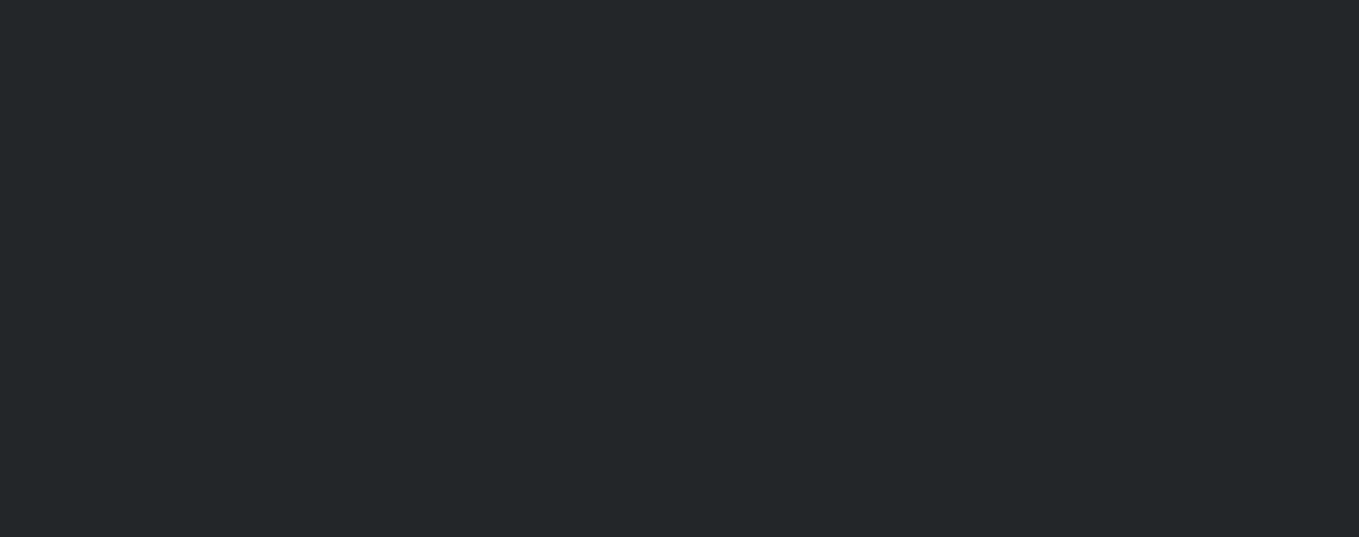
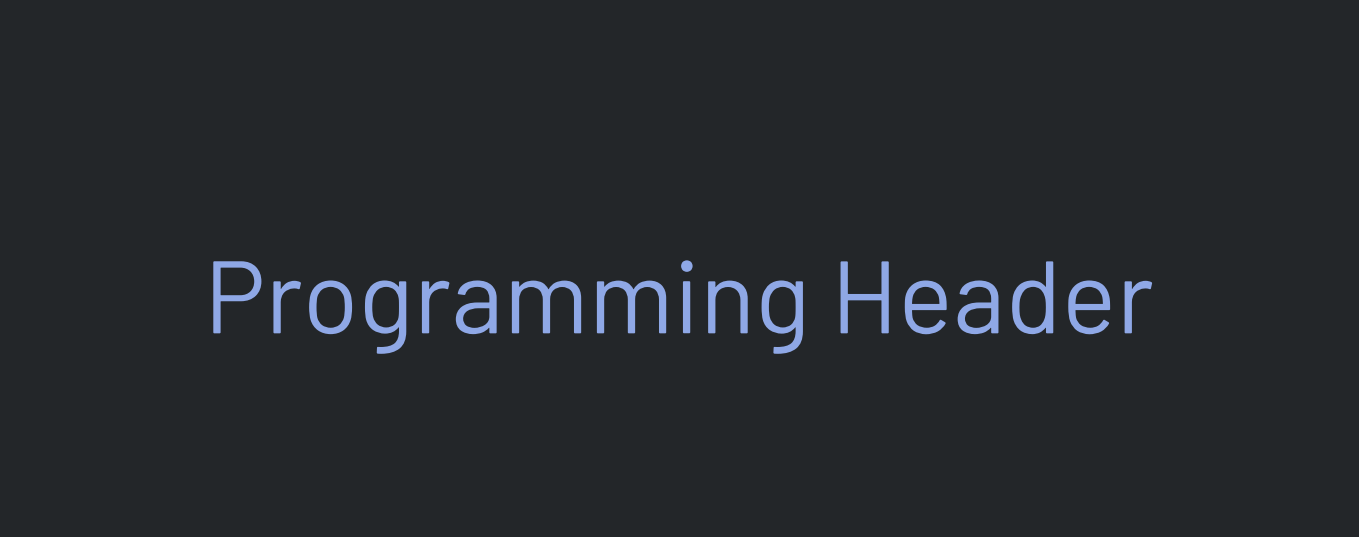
text: none -> Programming Header (682, 307)

